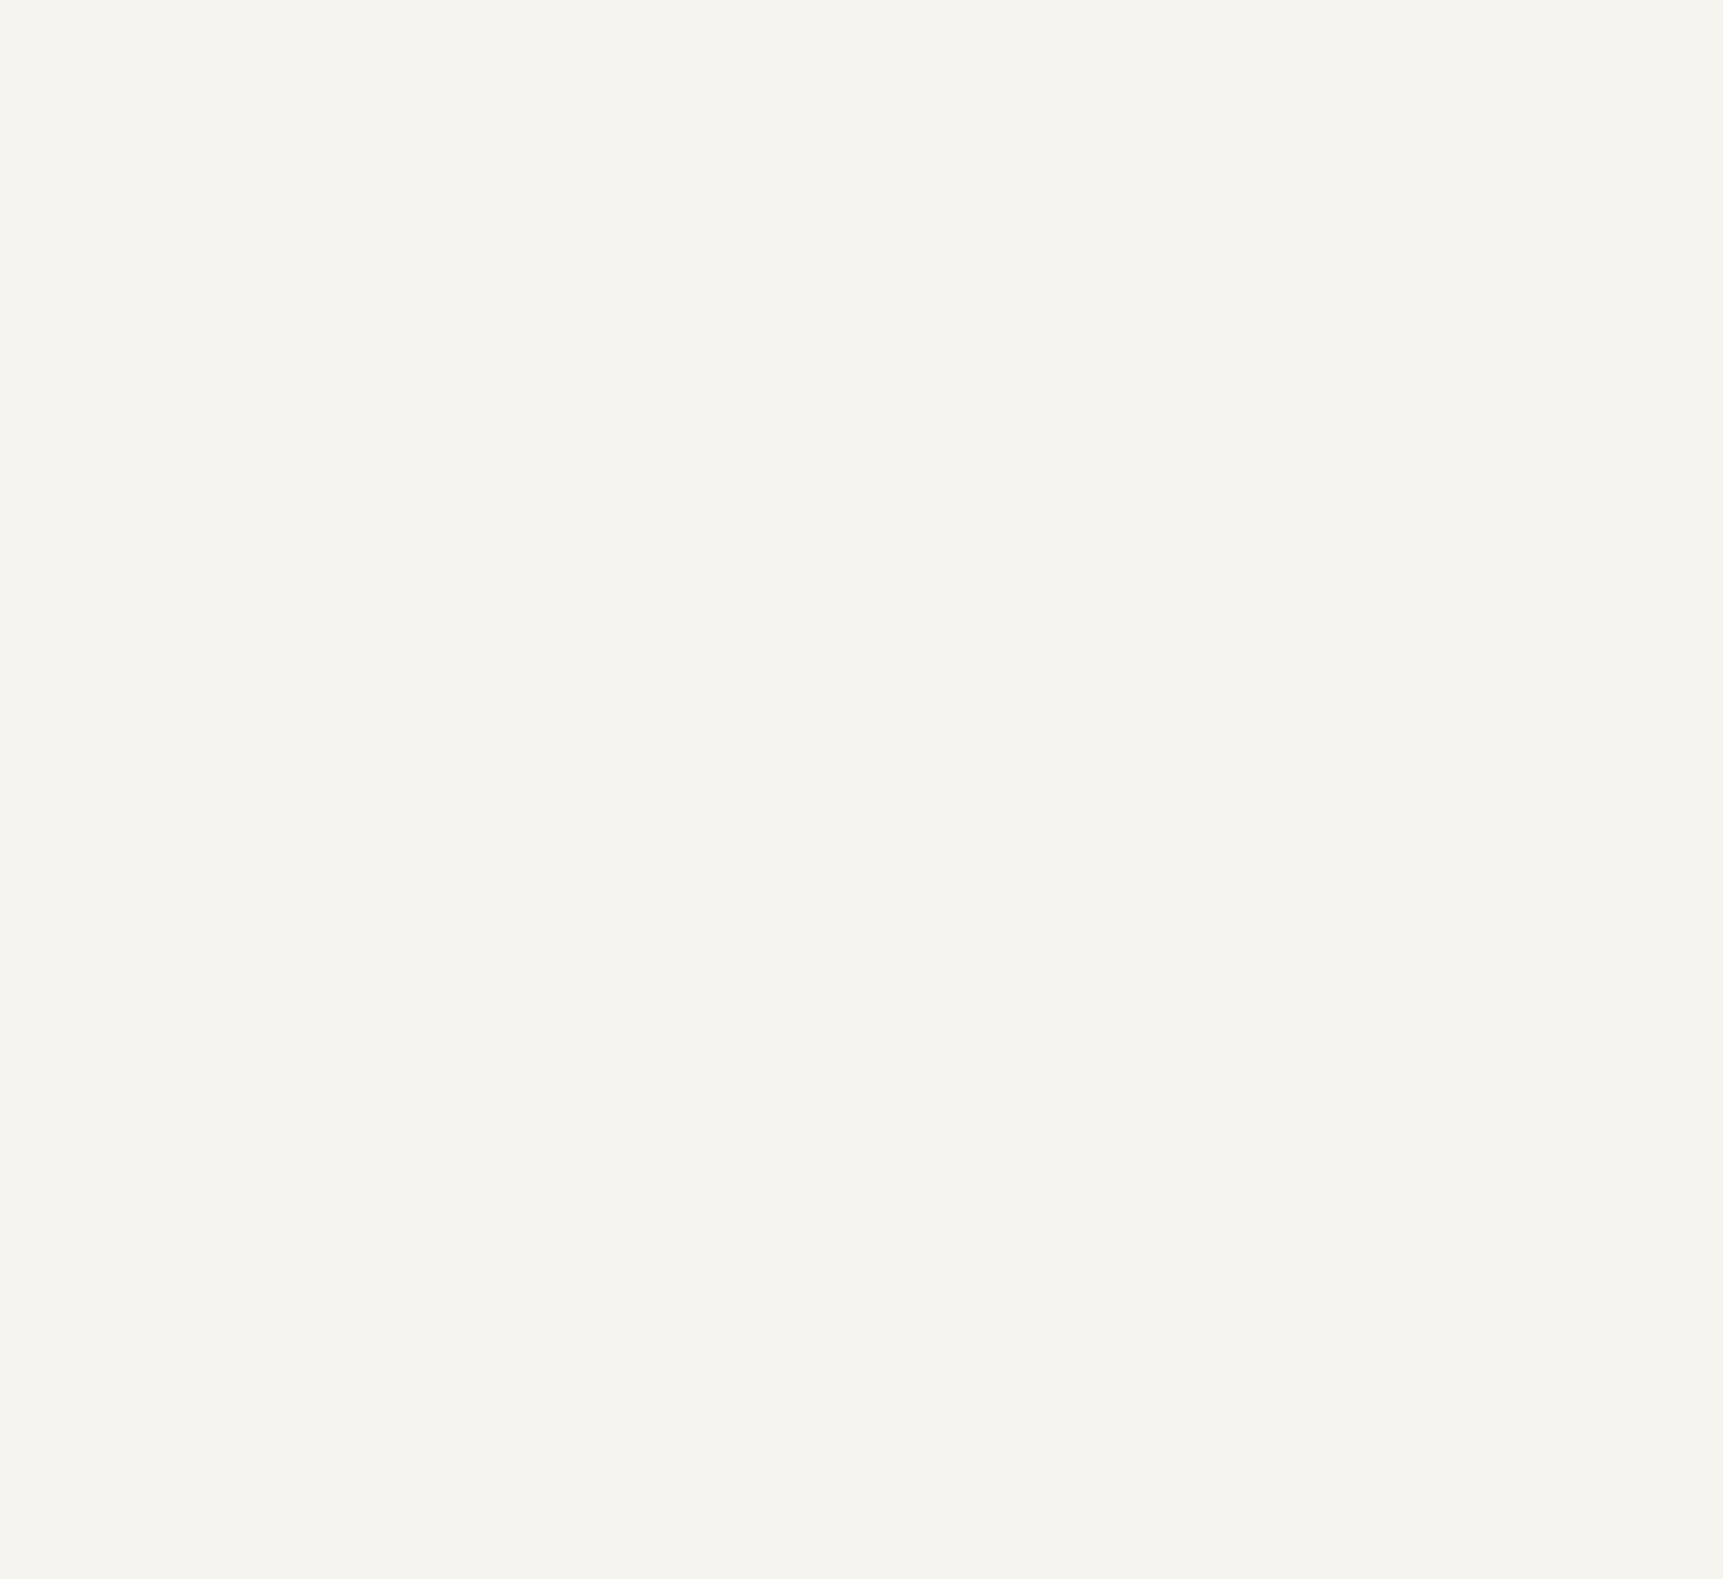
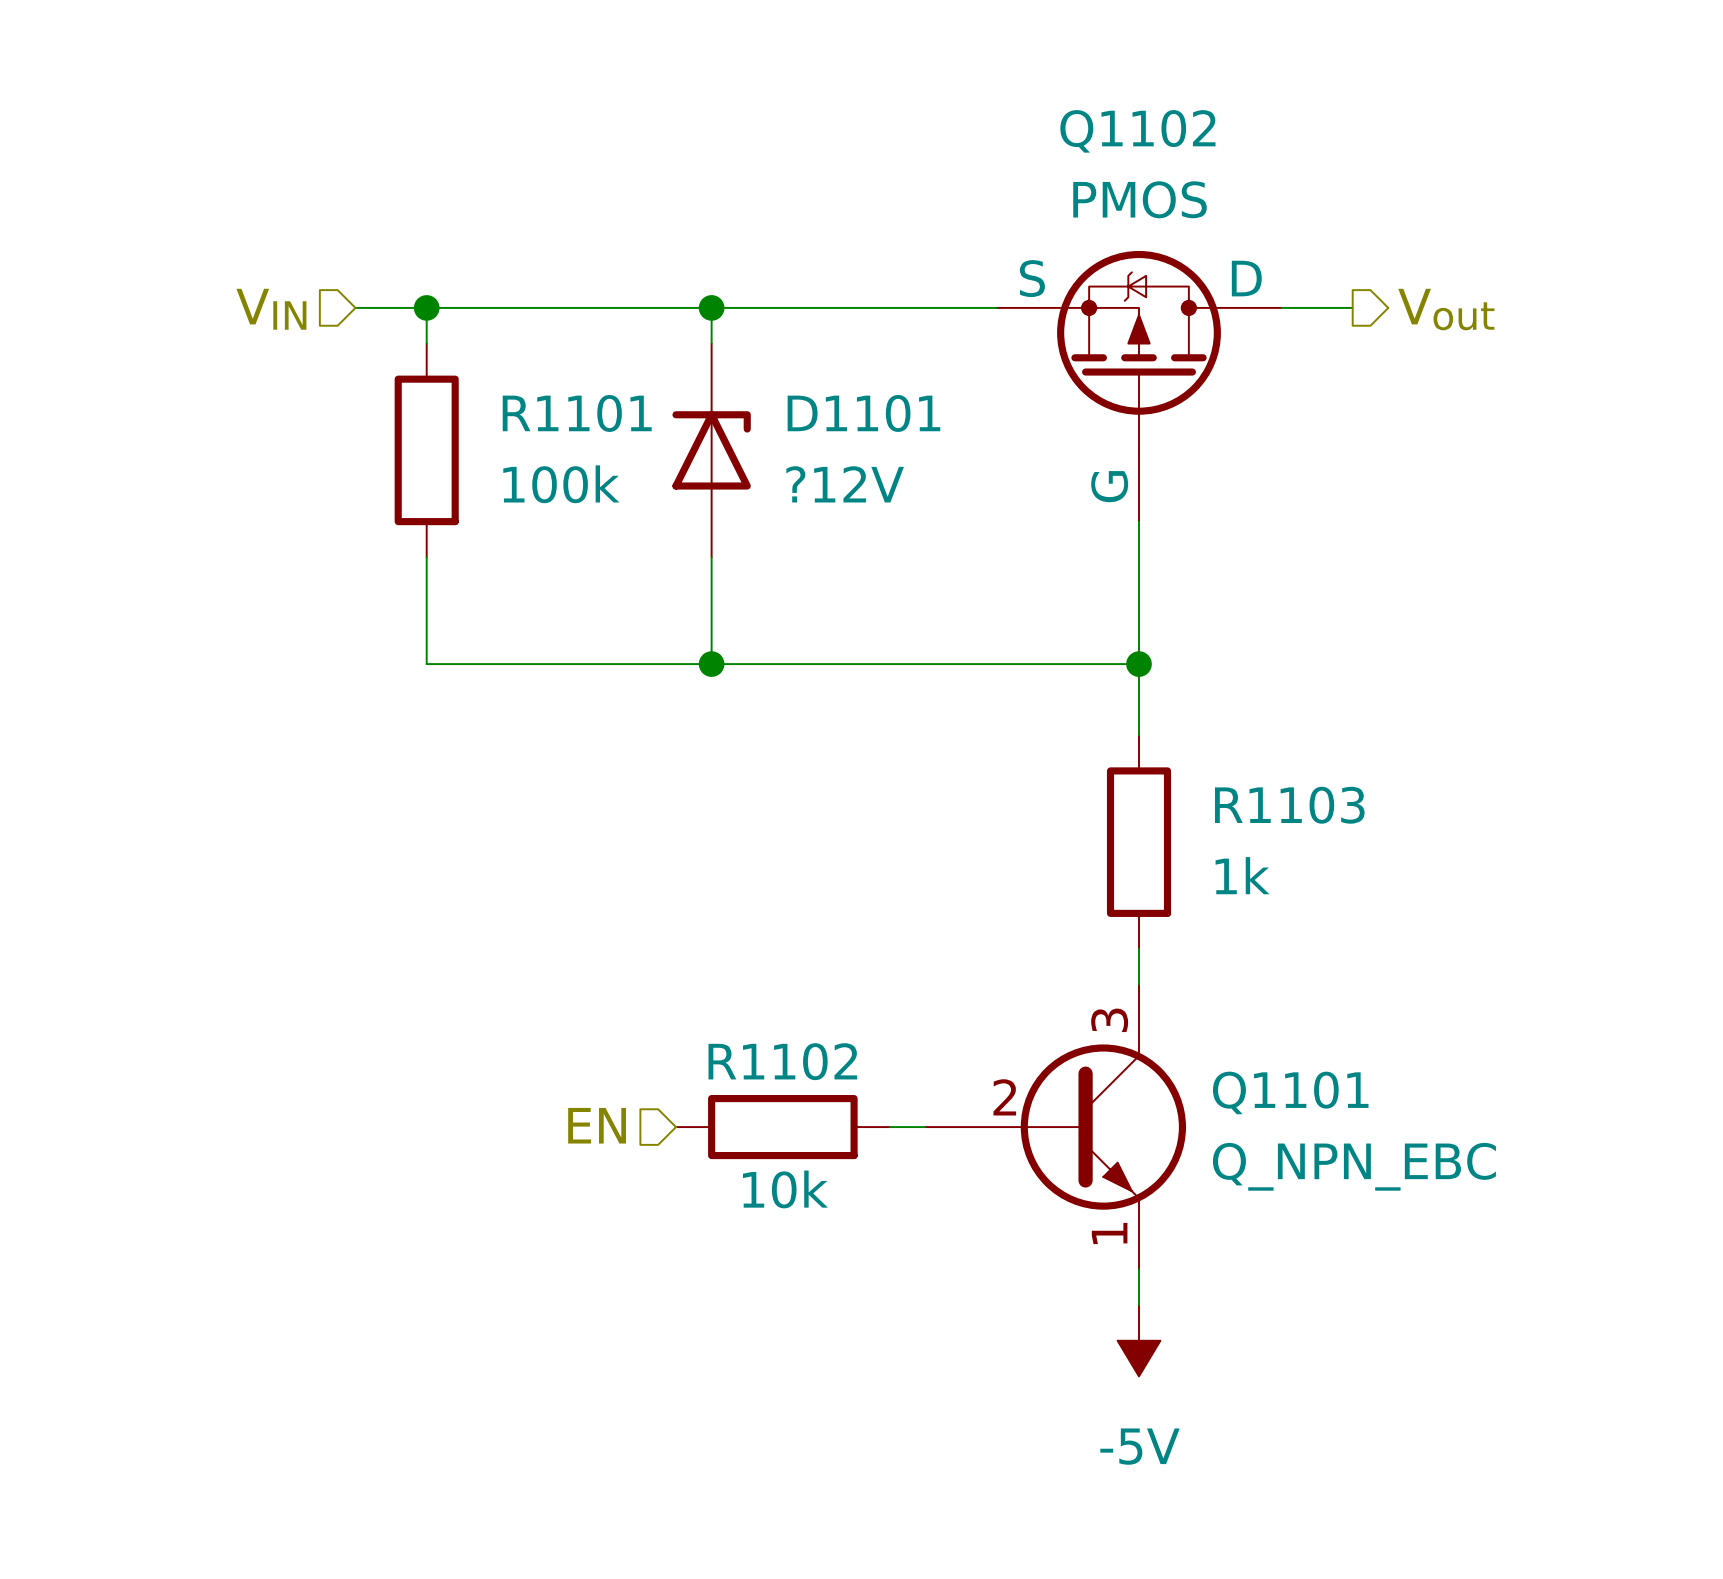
wire: none -> (355, 307) (996, 307)
wire: none -> (426, 307) (426, 343)
junction: none -> (426, 307)
wire: none -> (711, 307) (711, 343)
junction: none -> (711, 307)
wire: none -> (1281, 307) (1352, 307)
hierarchical label: none -> VIN (271, 309)
hierarchical label: none -> Vout (1446, 309)
Q1102: none -> PMOS (1139, 386)
R1101: none -> 100k (426, 450)
D1101: none -> ?12V (711, 450)
wire: none -> (1139, 521) (1139, 735)
wire: none -> (426, 557) (426, 664) (1139, 664)
wire: none -> (711, 557) (711, 664)
junction: none -> (711, 664)
junction: none -> (1139, 664)
R1103: none -> 1k (1139, 842)
wire: none -> (1139, 948) (1139, 984)
hierarchical label: none -> EN (597, 1125)
R1102: none -> 10k (782, 1127)
wire: none -> (889, 1127) (925, 1127)
Q1101: none -> Q_NPN_EBC (1055, 1127)
wire: none -> (1139, 1269) (1139, 1305)
power symbol: none -> -5V (1139, 1340)

